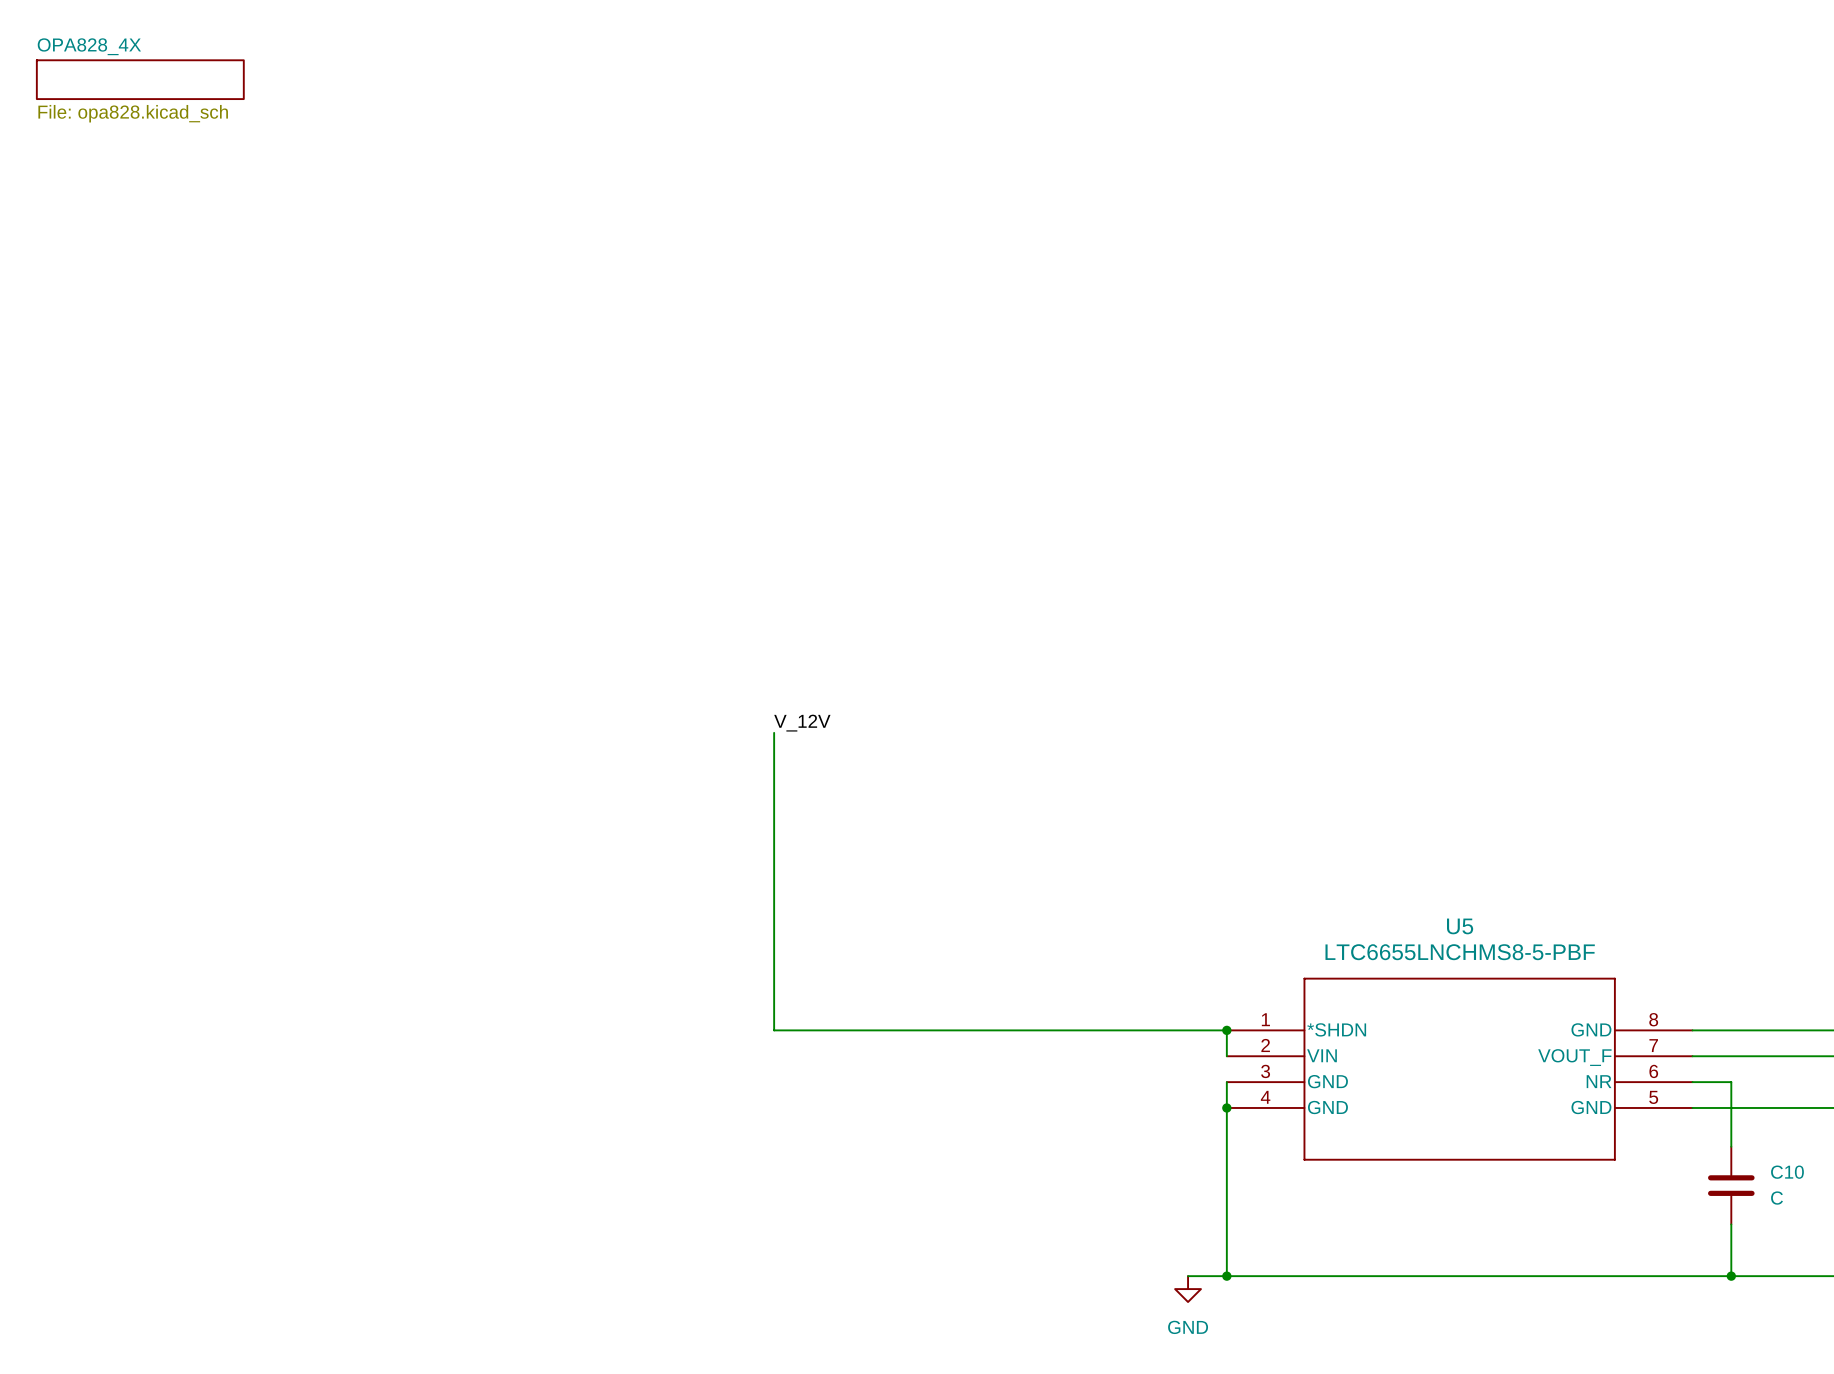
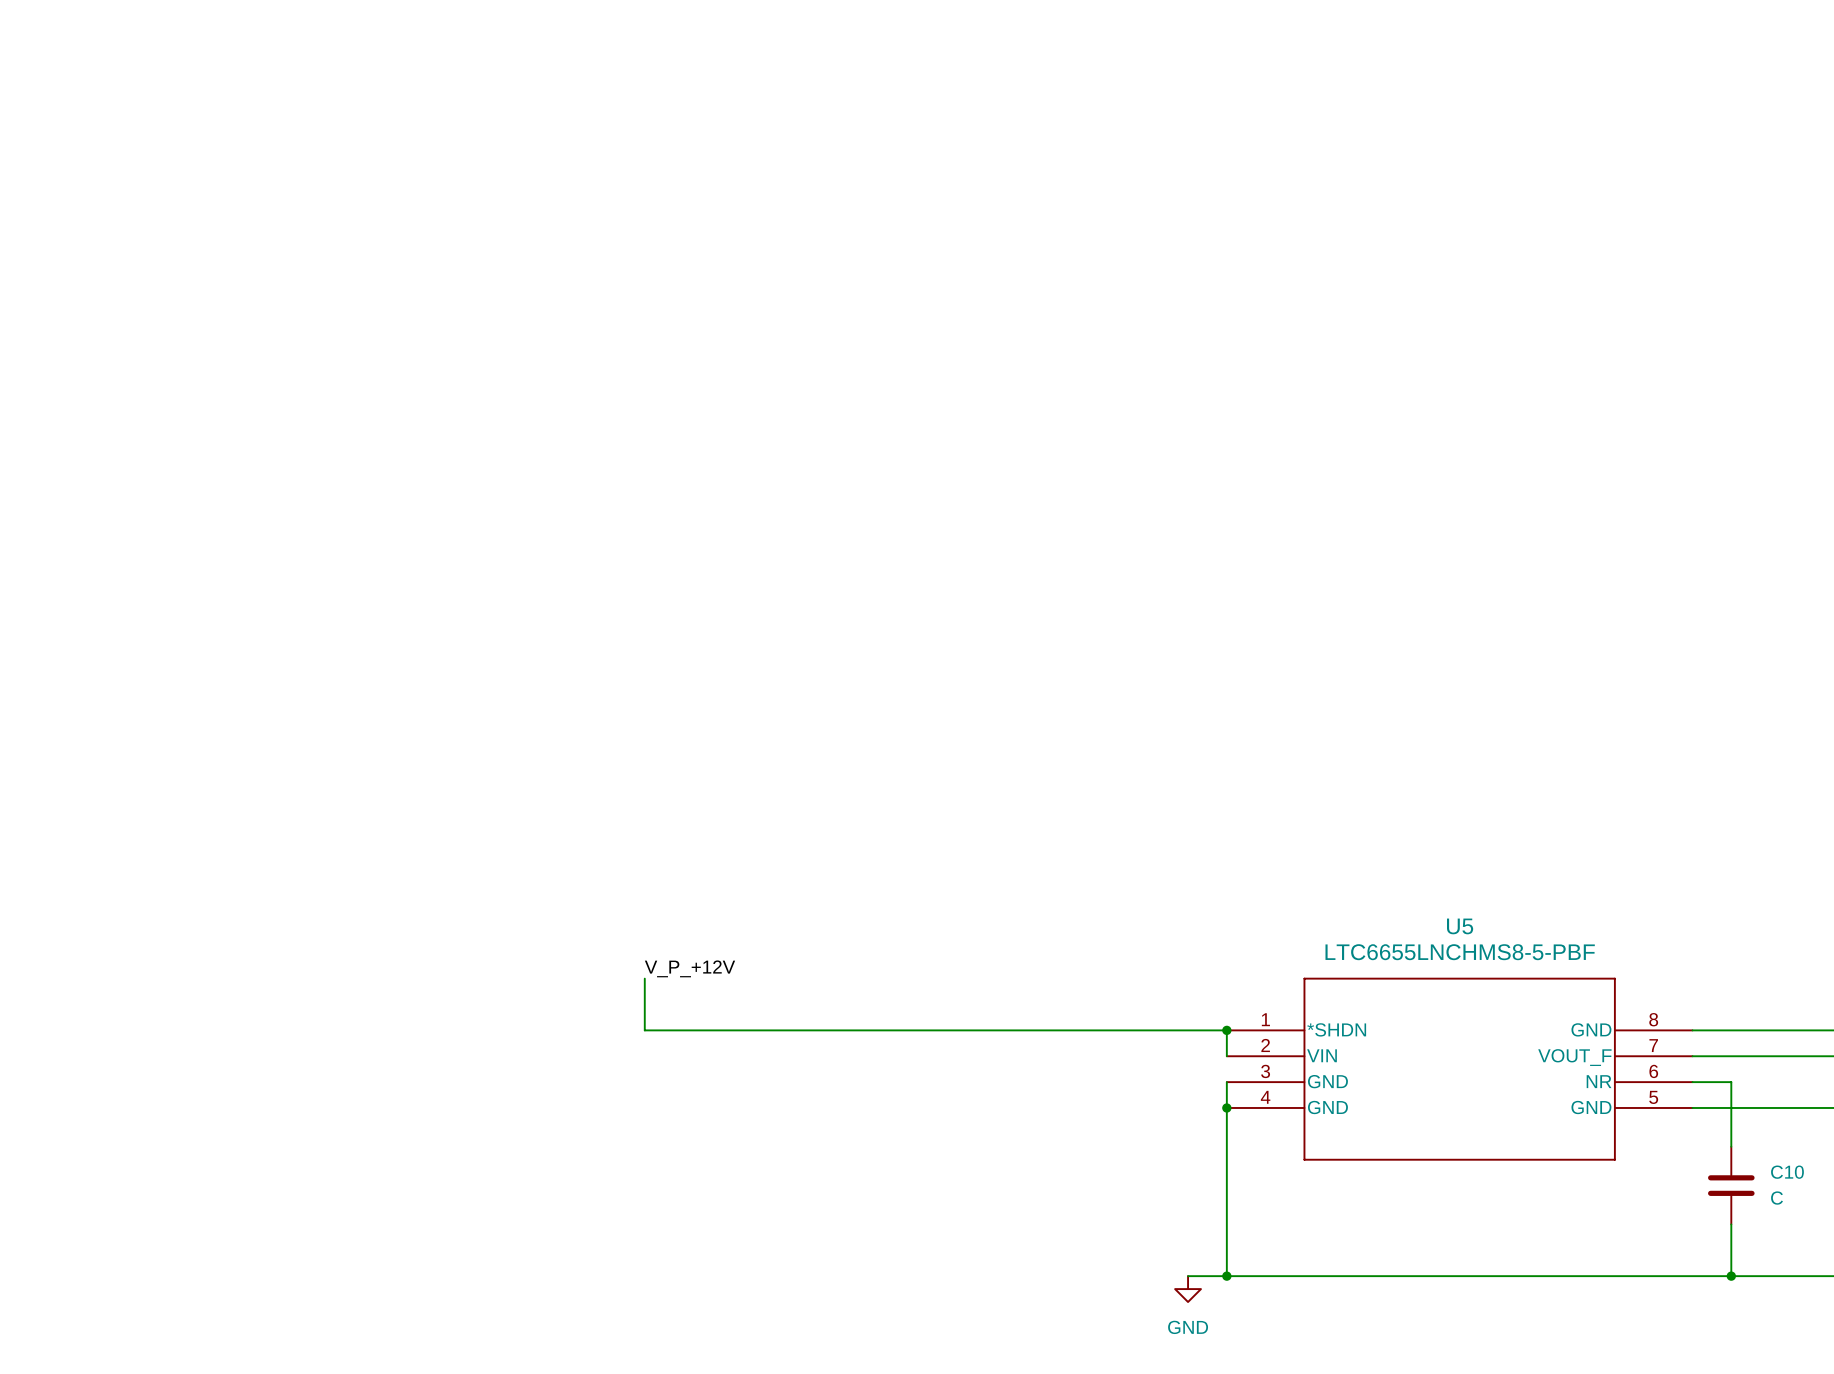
sheet OPA828_4X: File: opa828.kicad_sch (140, 79) -> none
label: V_12V (802, 723) -> none
wire: (774, 732) (774, 1030) -> (644, 978) (644, 1030) (774, 1030)
label: none -> V_P_+12V (690, 968)

